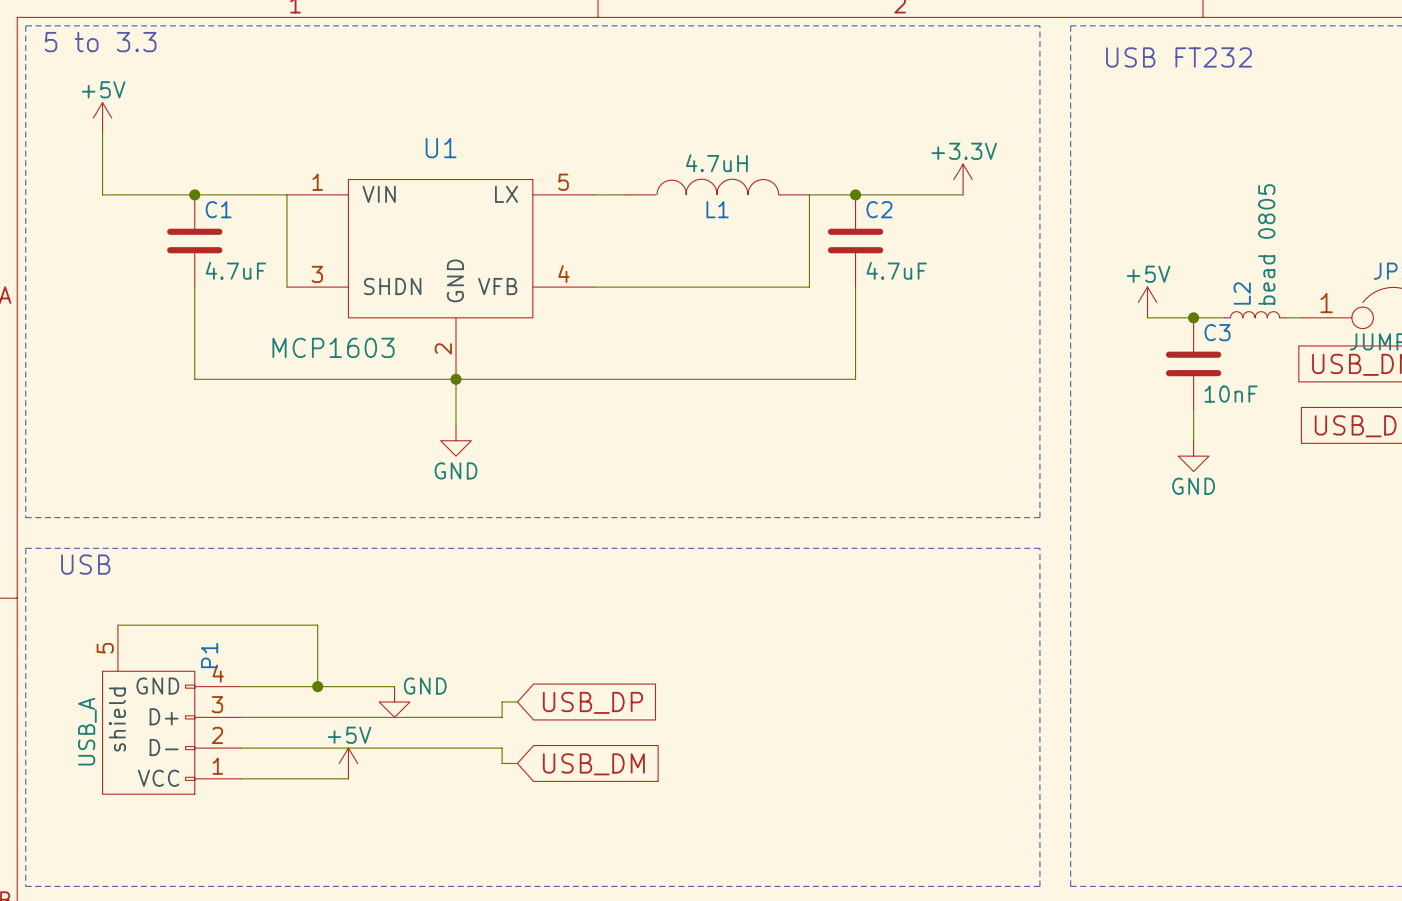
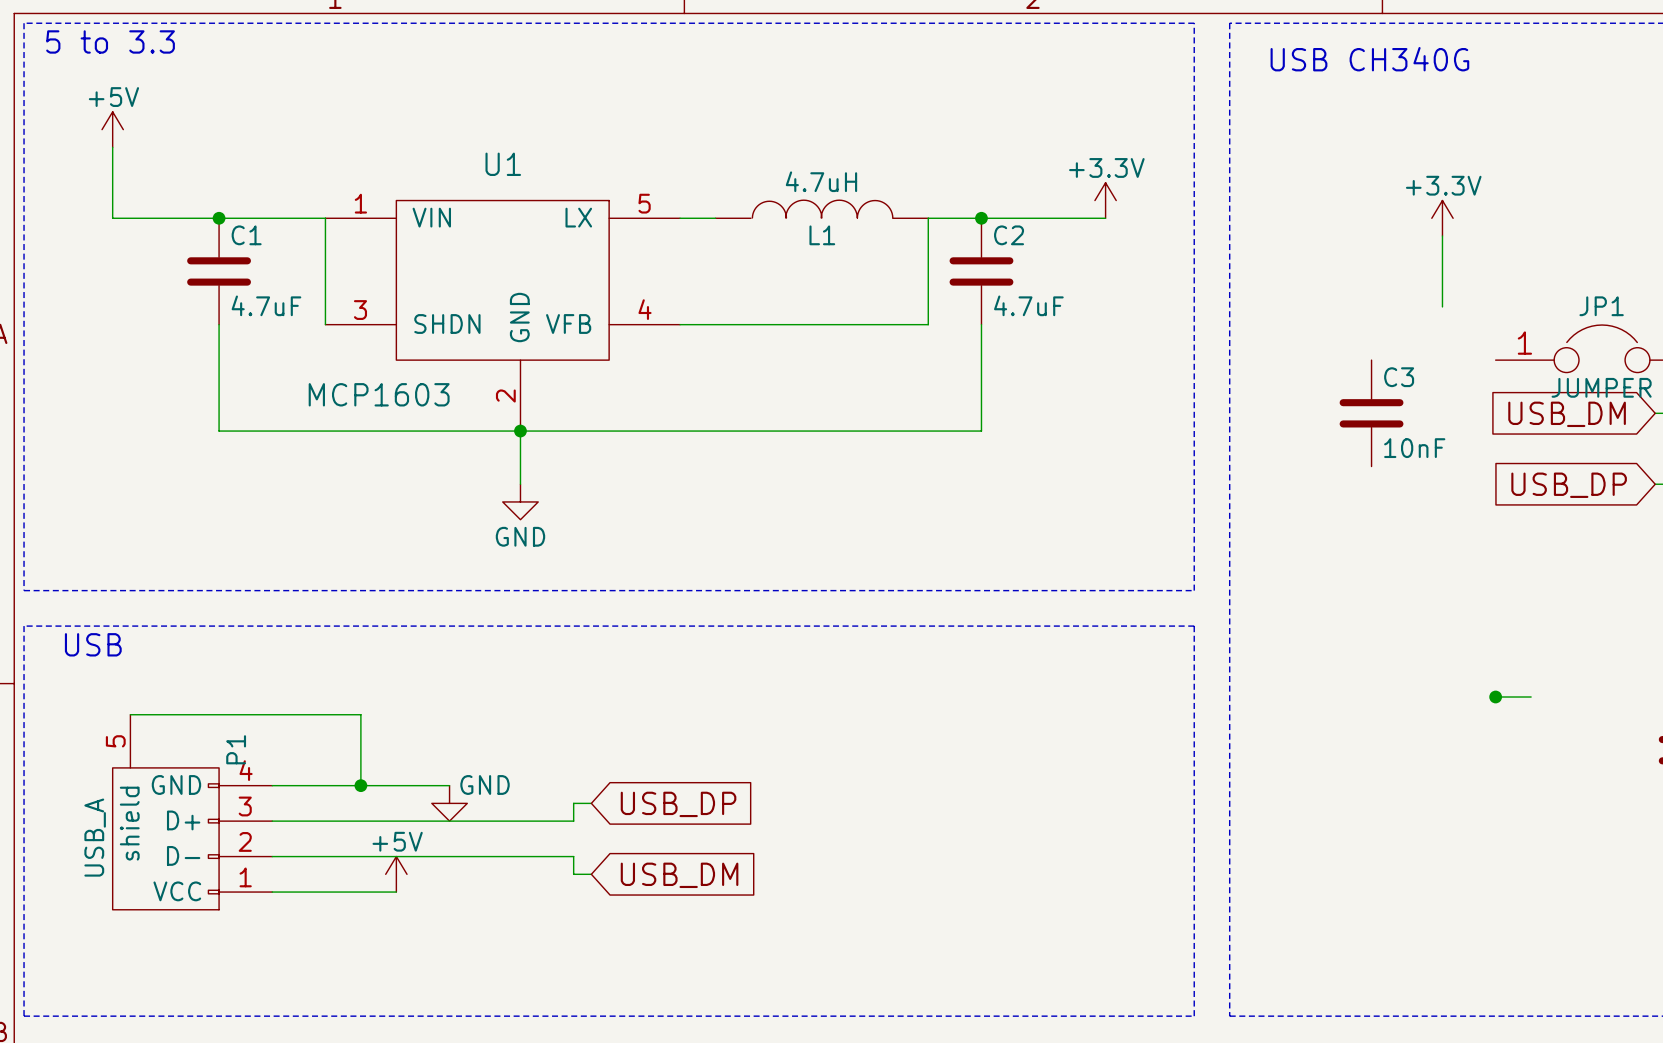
text: USB FT232 (1179, 57) -> USB CH340G (1369, 59)
power symbol: none -> +3.3V (1442, 218)
wire: none -> (1442, 236) (1442, 306)
power symbol: +5V (1147, 302) -> none
L2: bead 0805 (1255, 314) -> none
wire: (1147, 317) (1224, 317) -> none
junction: (1193, 317) -> none
wire: (1285, 317) (1301, 317) -> none
wire: (1193, 410) (1193, 440) -> none
power symbol: GND (1193, 456) -> none
wire: none -> (1495, 697) (1531, 697)
junction: none -> (1495, 697)

